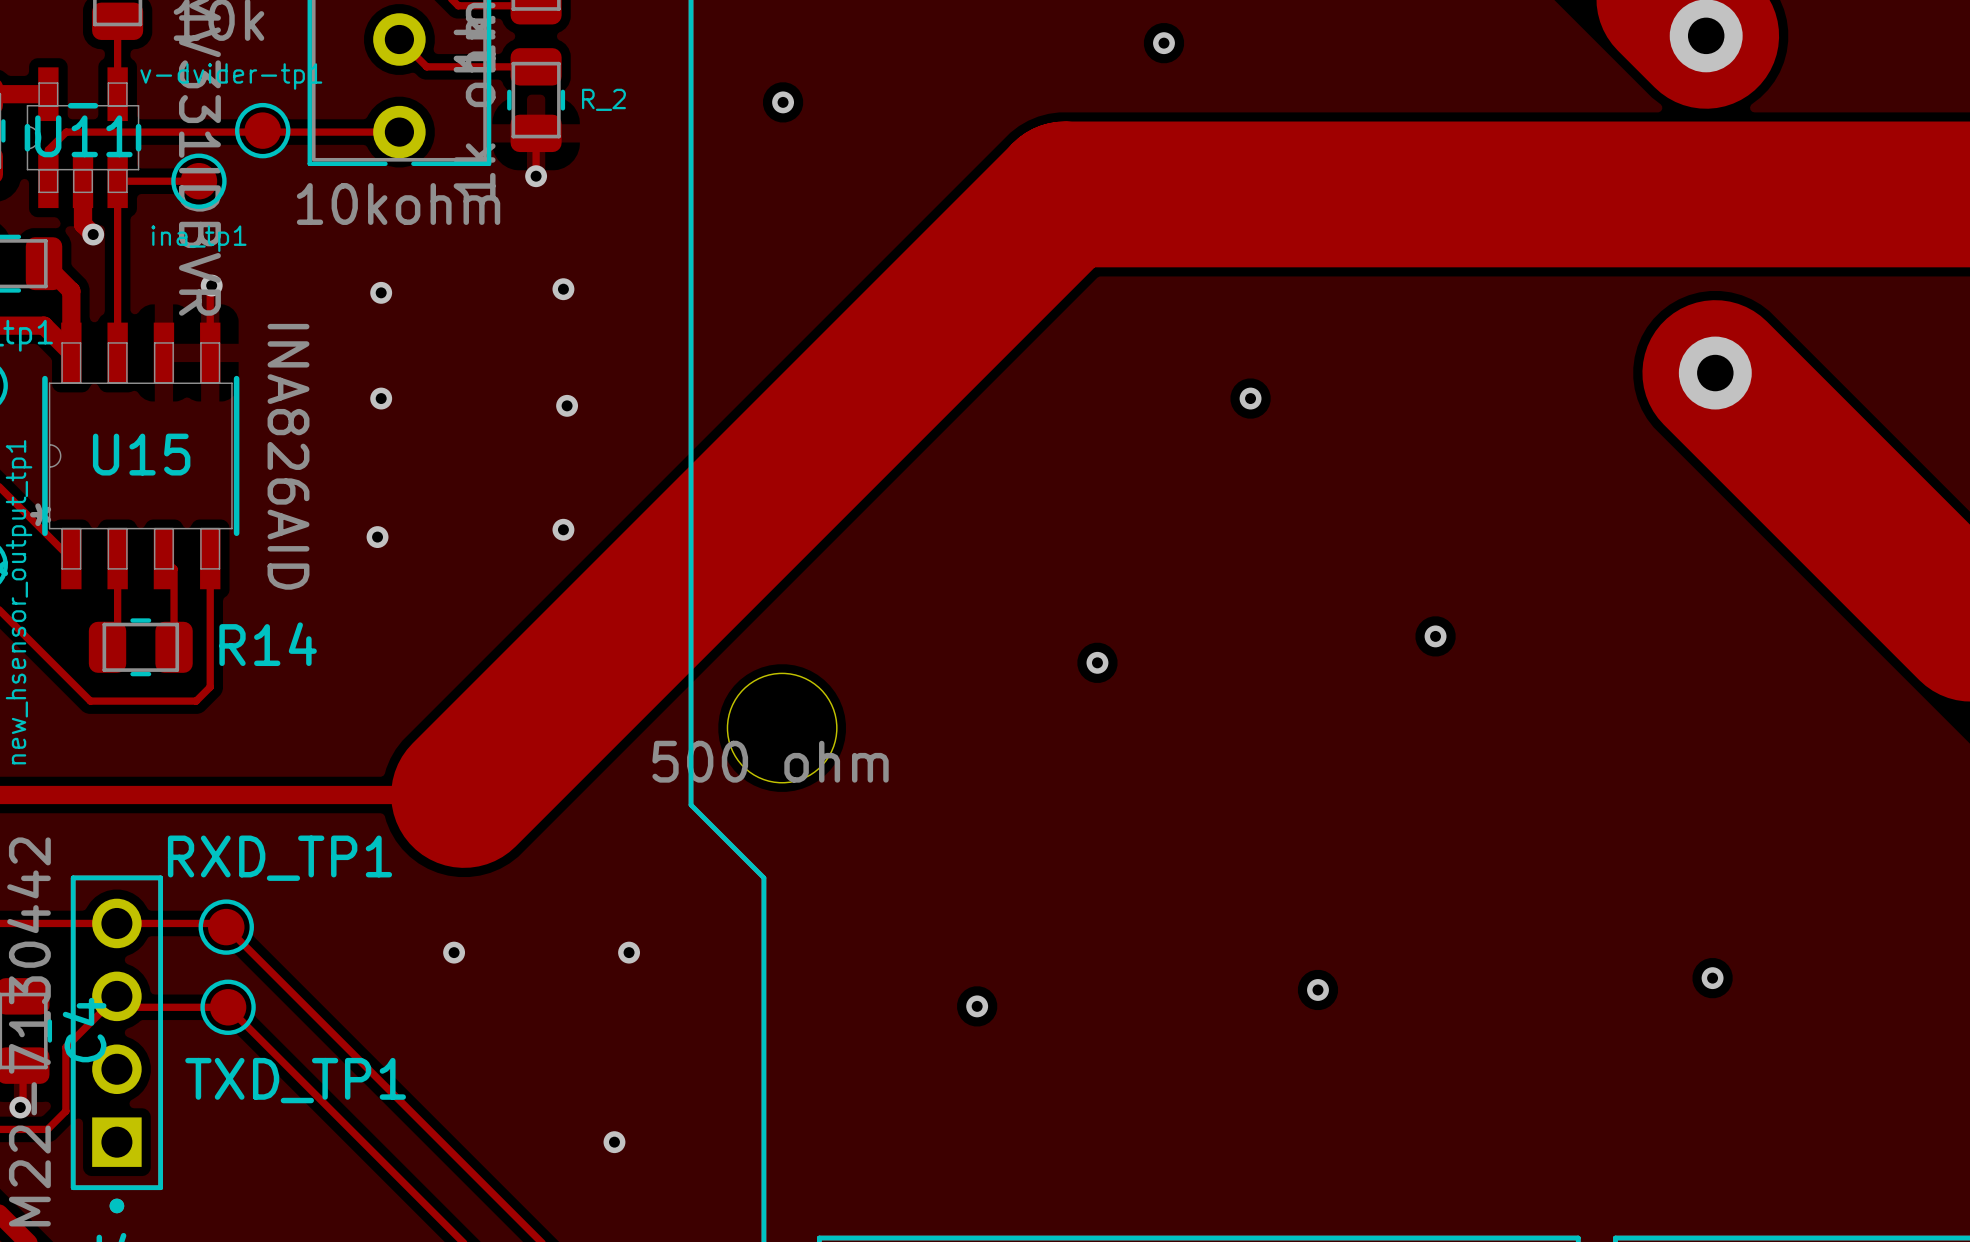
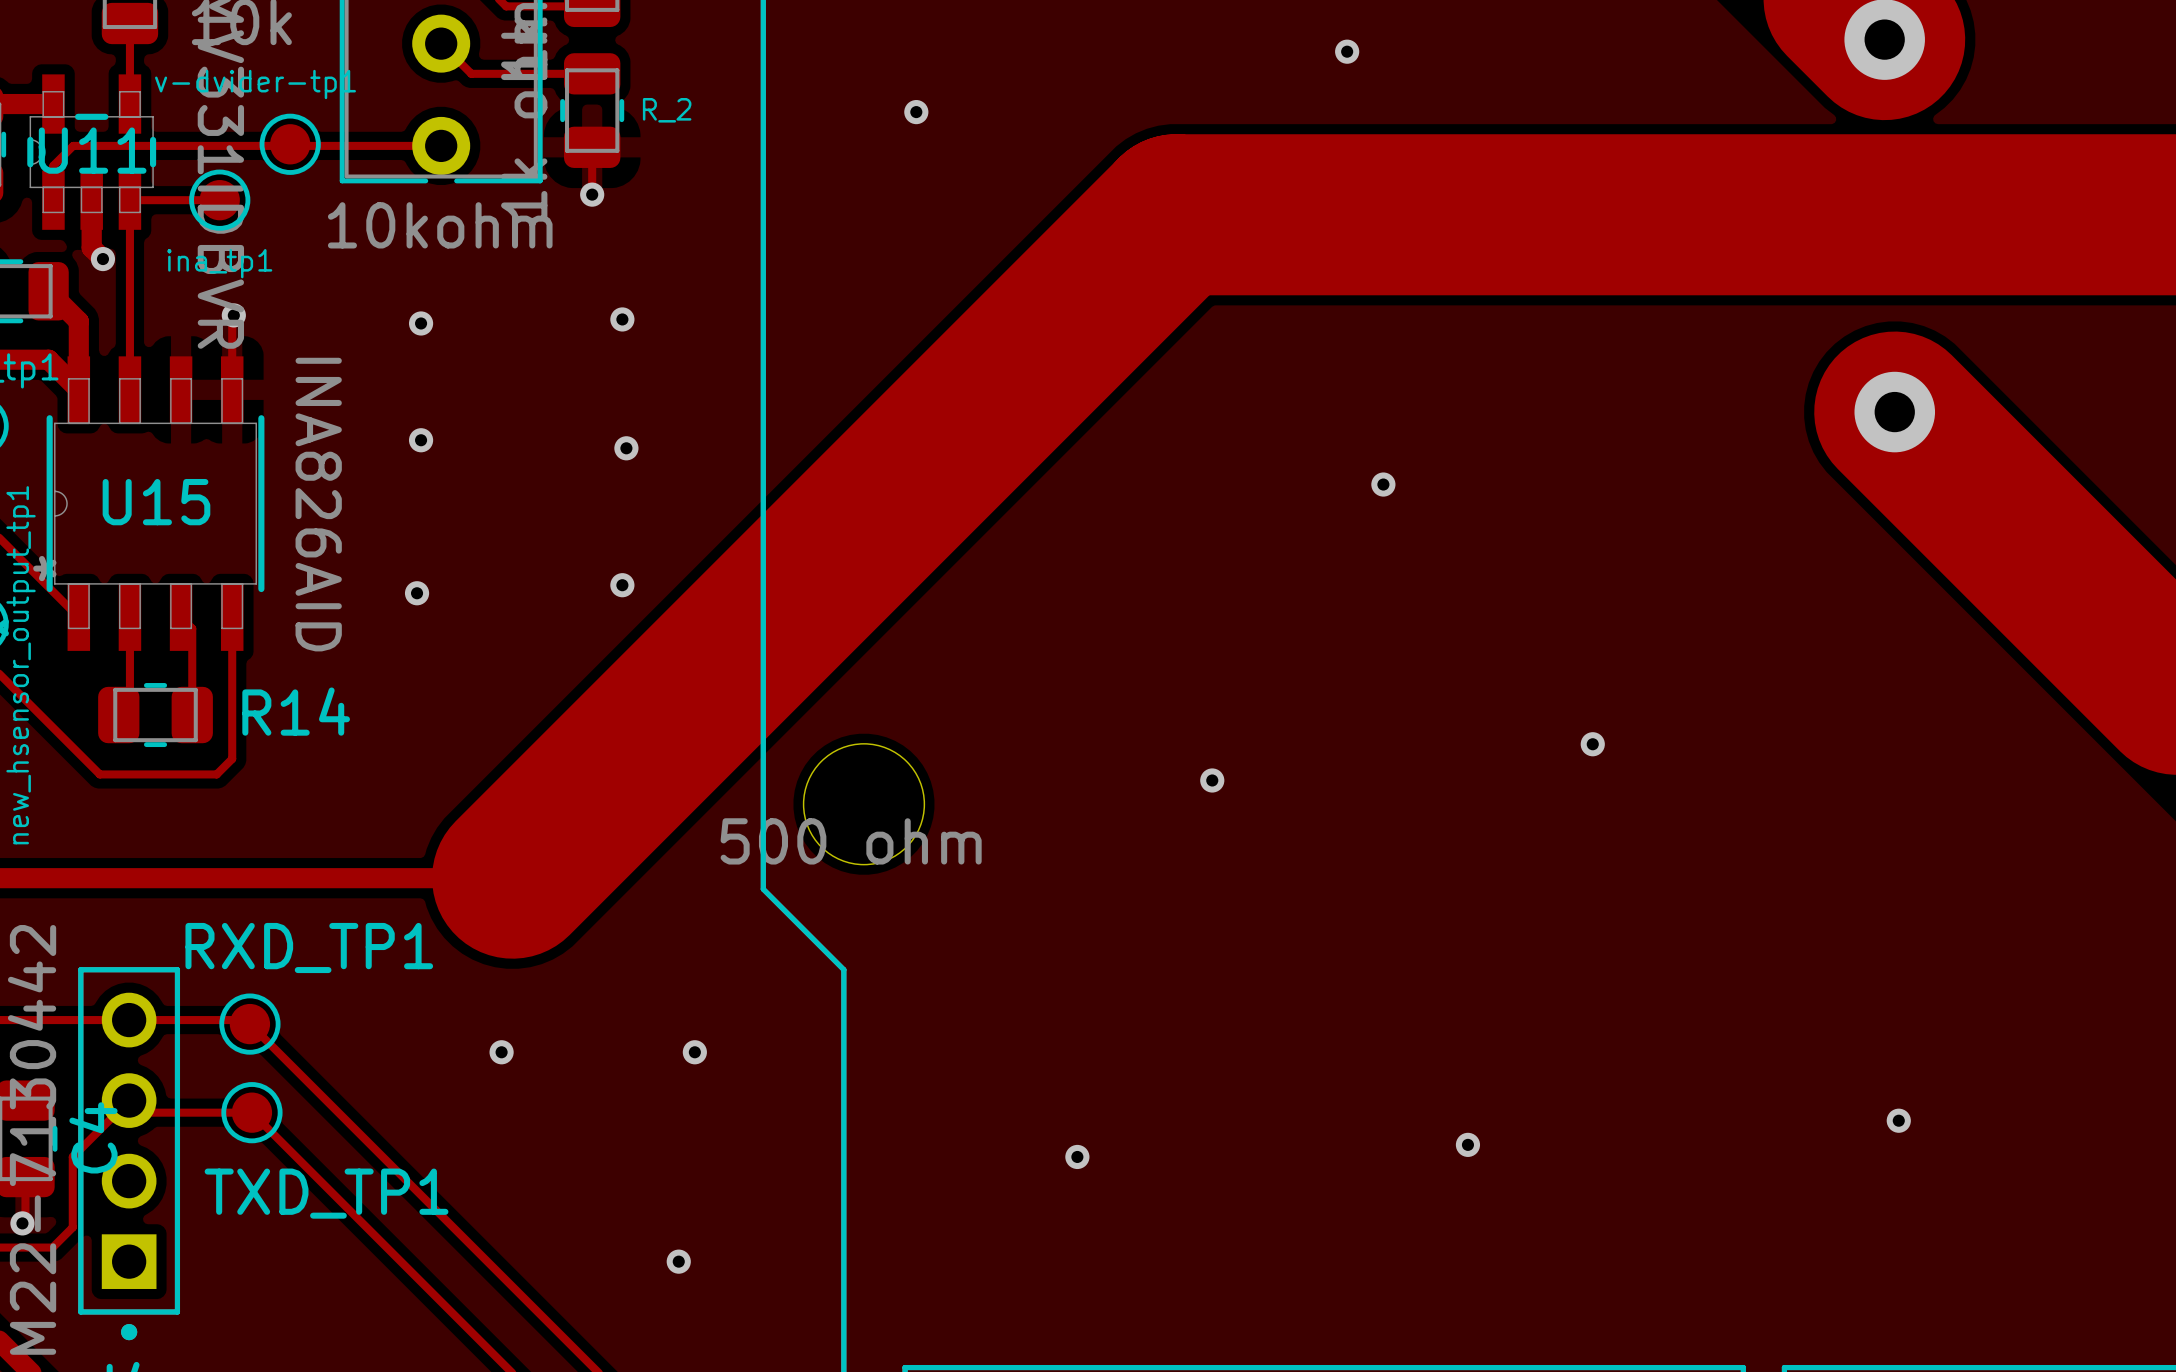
via position: (1163, 43) -> (1347, 51)
via position: (783, 102) -> (916, 112)
via position: (1250, 398) -> (1383, 484)
via position: (1435, 636) -> (1592, 744)
via position: (1097, 662) -> (1212, 780)
via position: (1712, 978) -> (1898, 1120)
via position: (1317, 989) -> (1467, 1144)
via position: (977, 1006) -> (1077, 1156)

